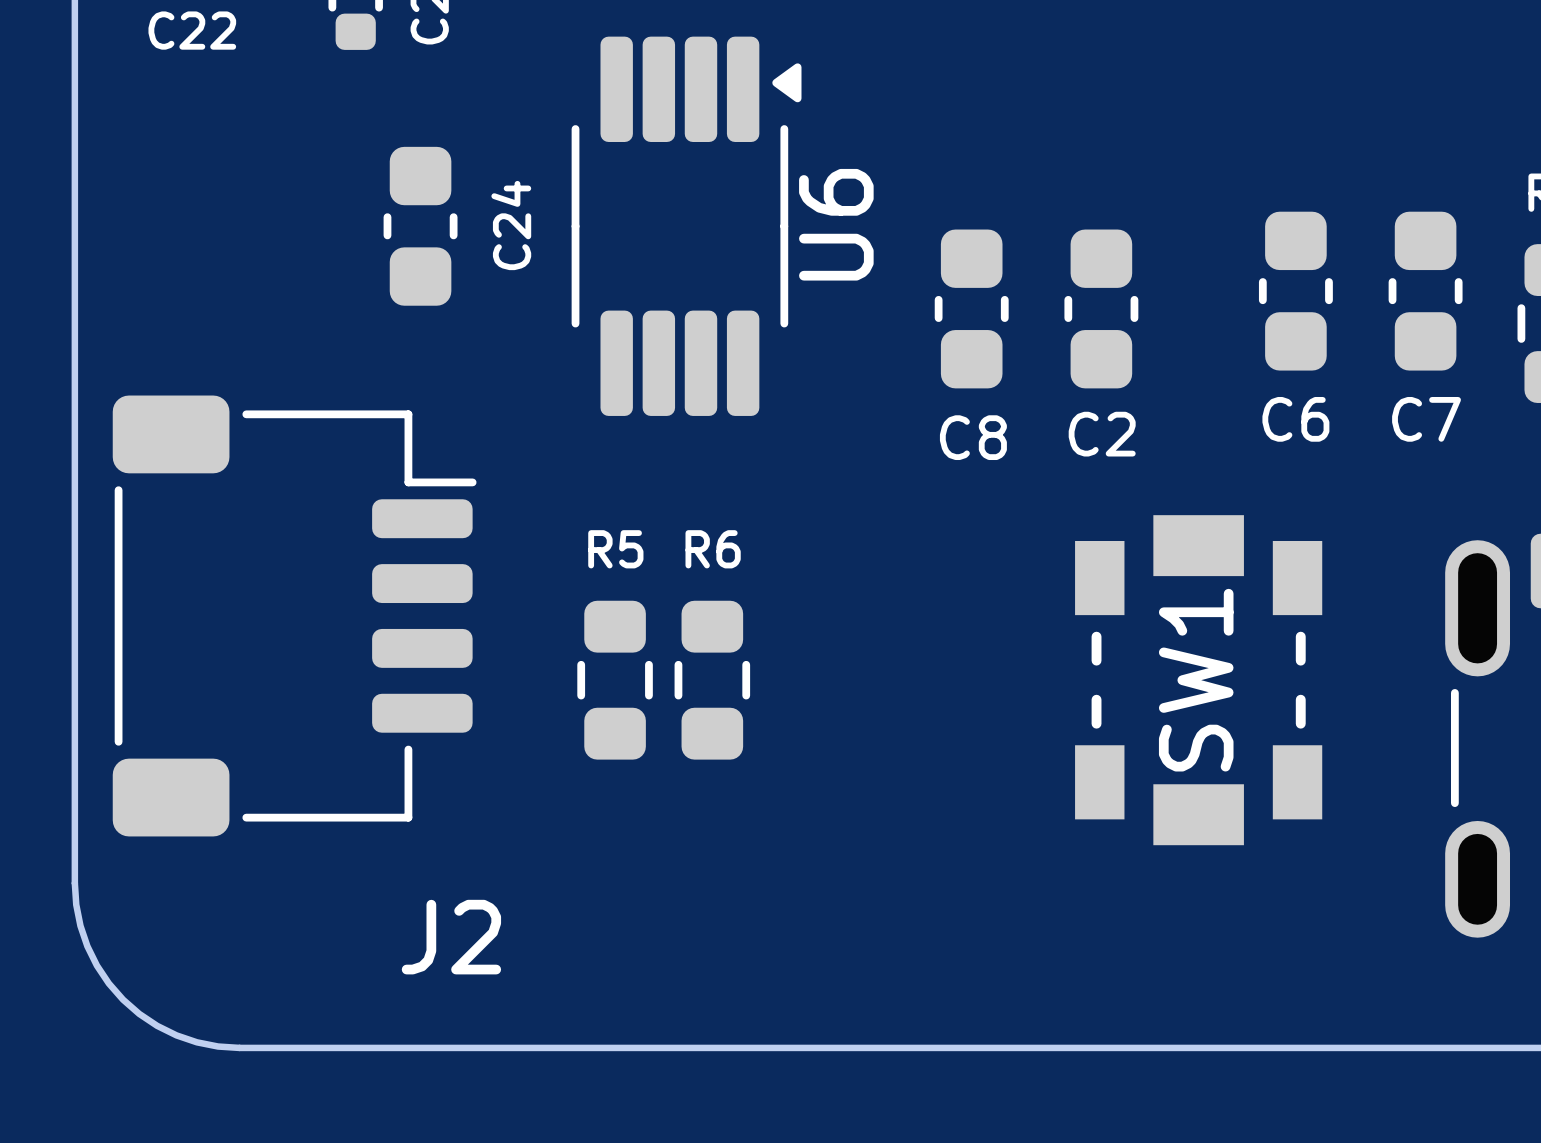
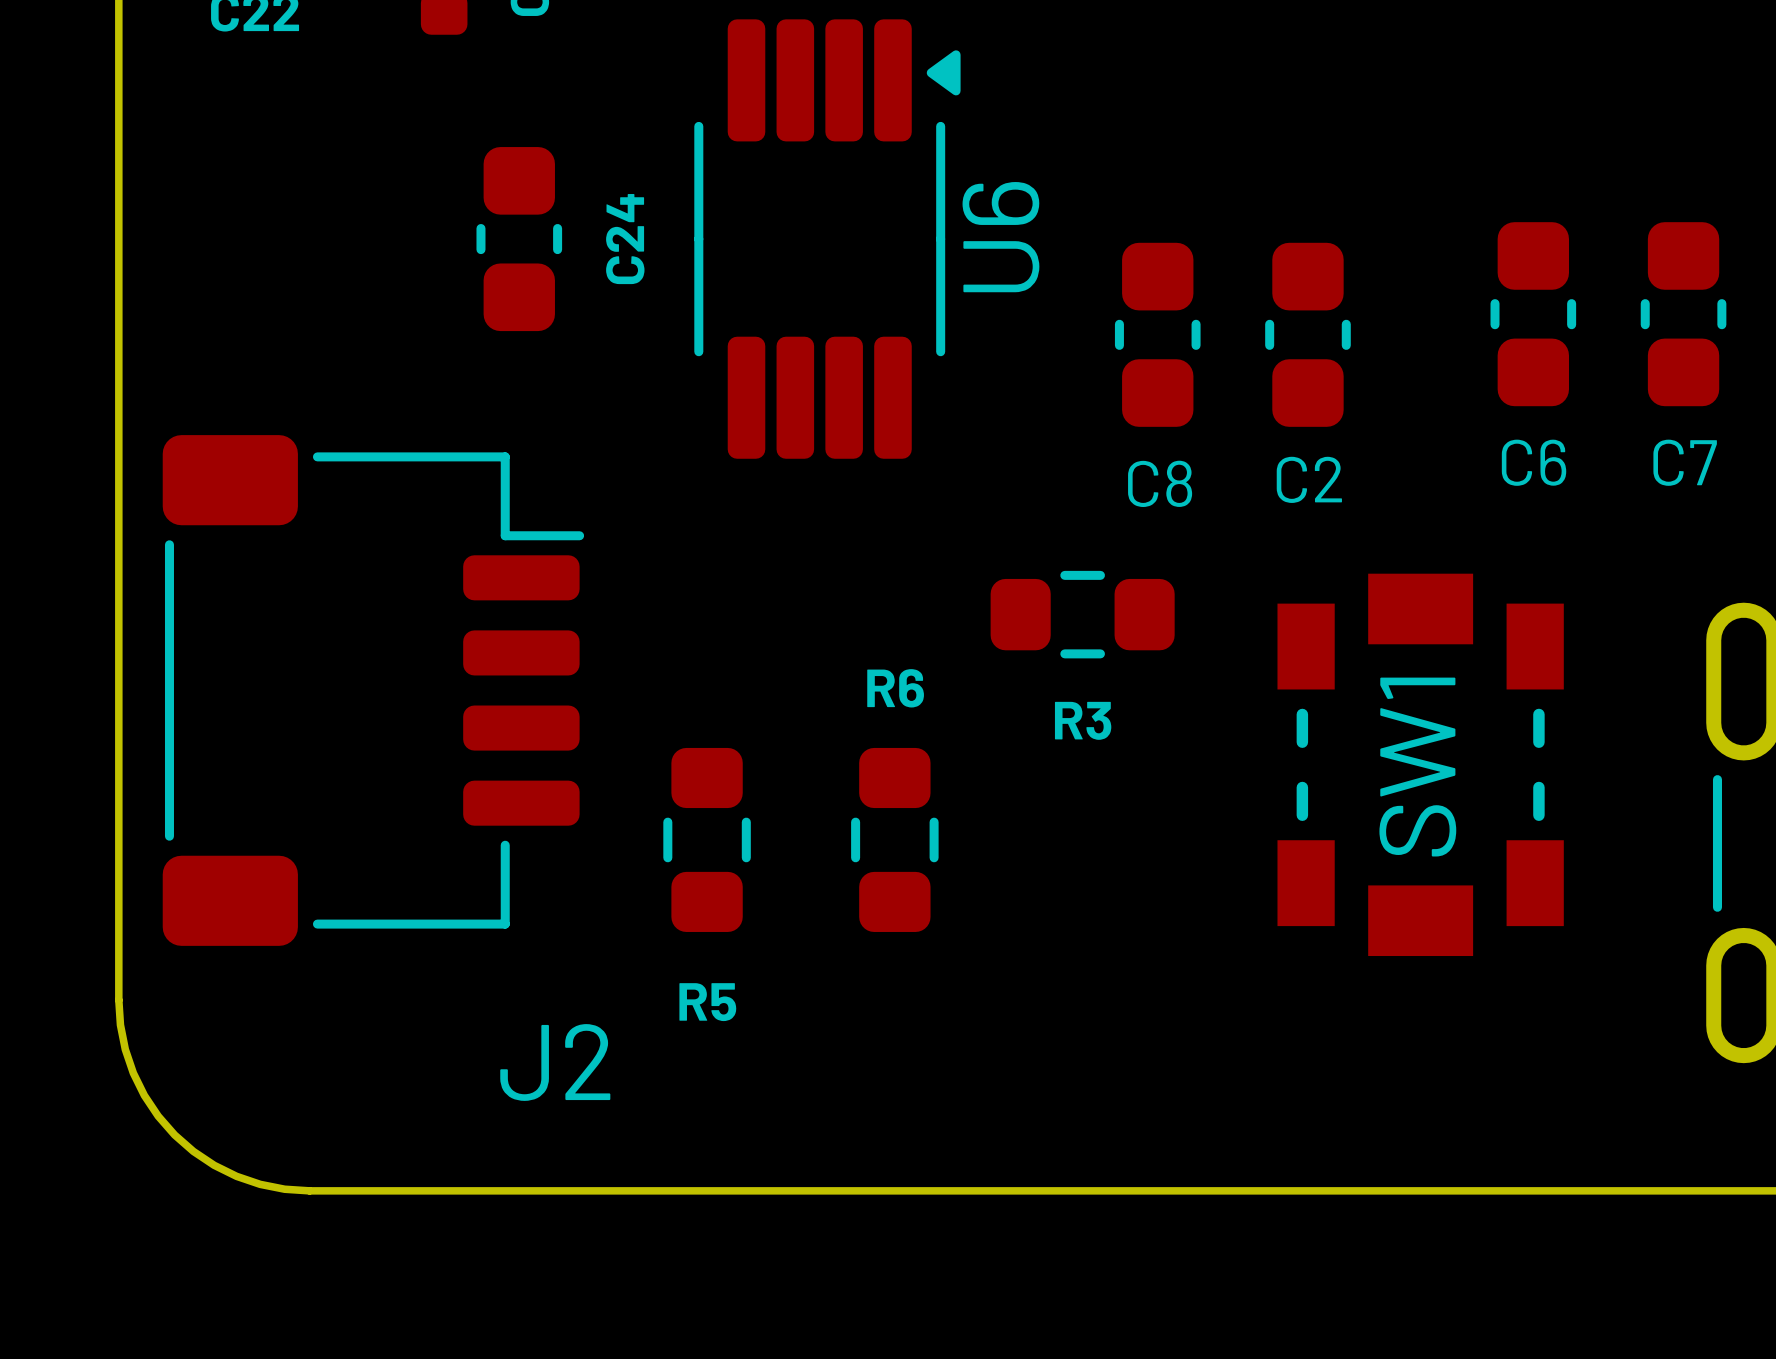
R5 name position: R5 (615, 549) -> R5 (707, 1002)
R3: none -> (1082, 614)
R5 position: (615, 680) -> (707, 839)
R6 position: (712, 680) -> (894, 839)

